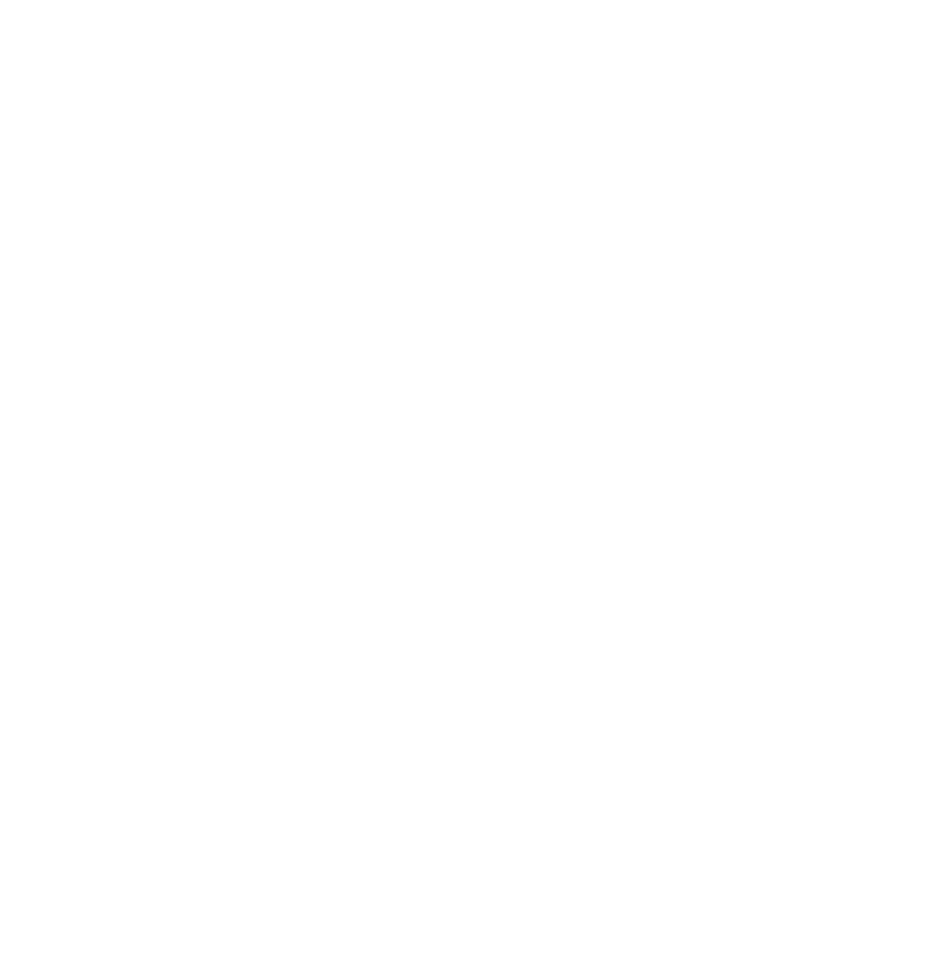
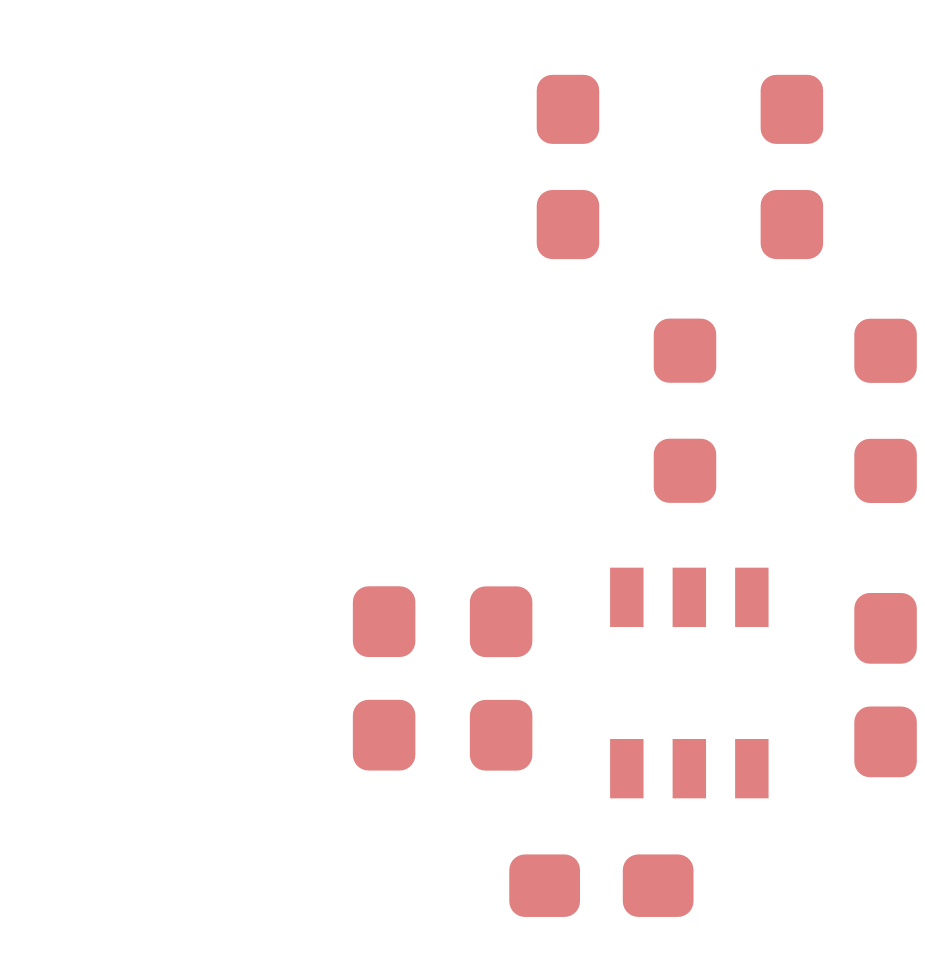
part: none -> (567, 166)
part: none -> (791, 166)
part: none -> (684, 410)
part: none -> (885, 410)
part: none -> (384, 678)
part: none -> (501, 678)
part: none -> (689, 683)
part: none -> (885, 685)
part: none -> (601, 885)

